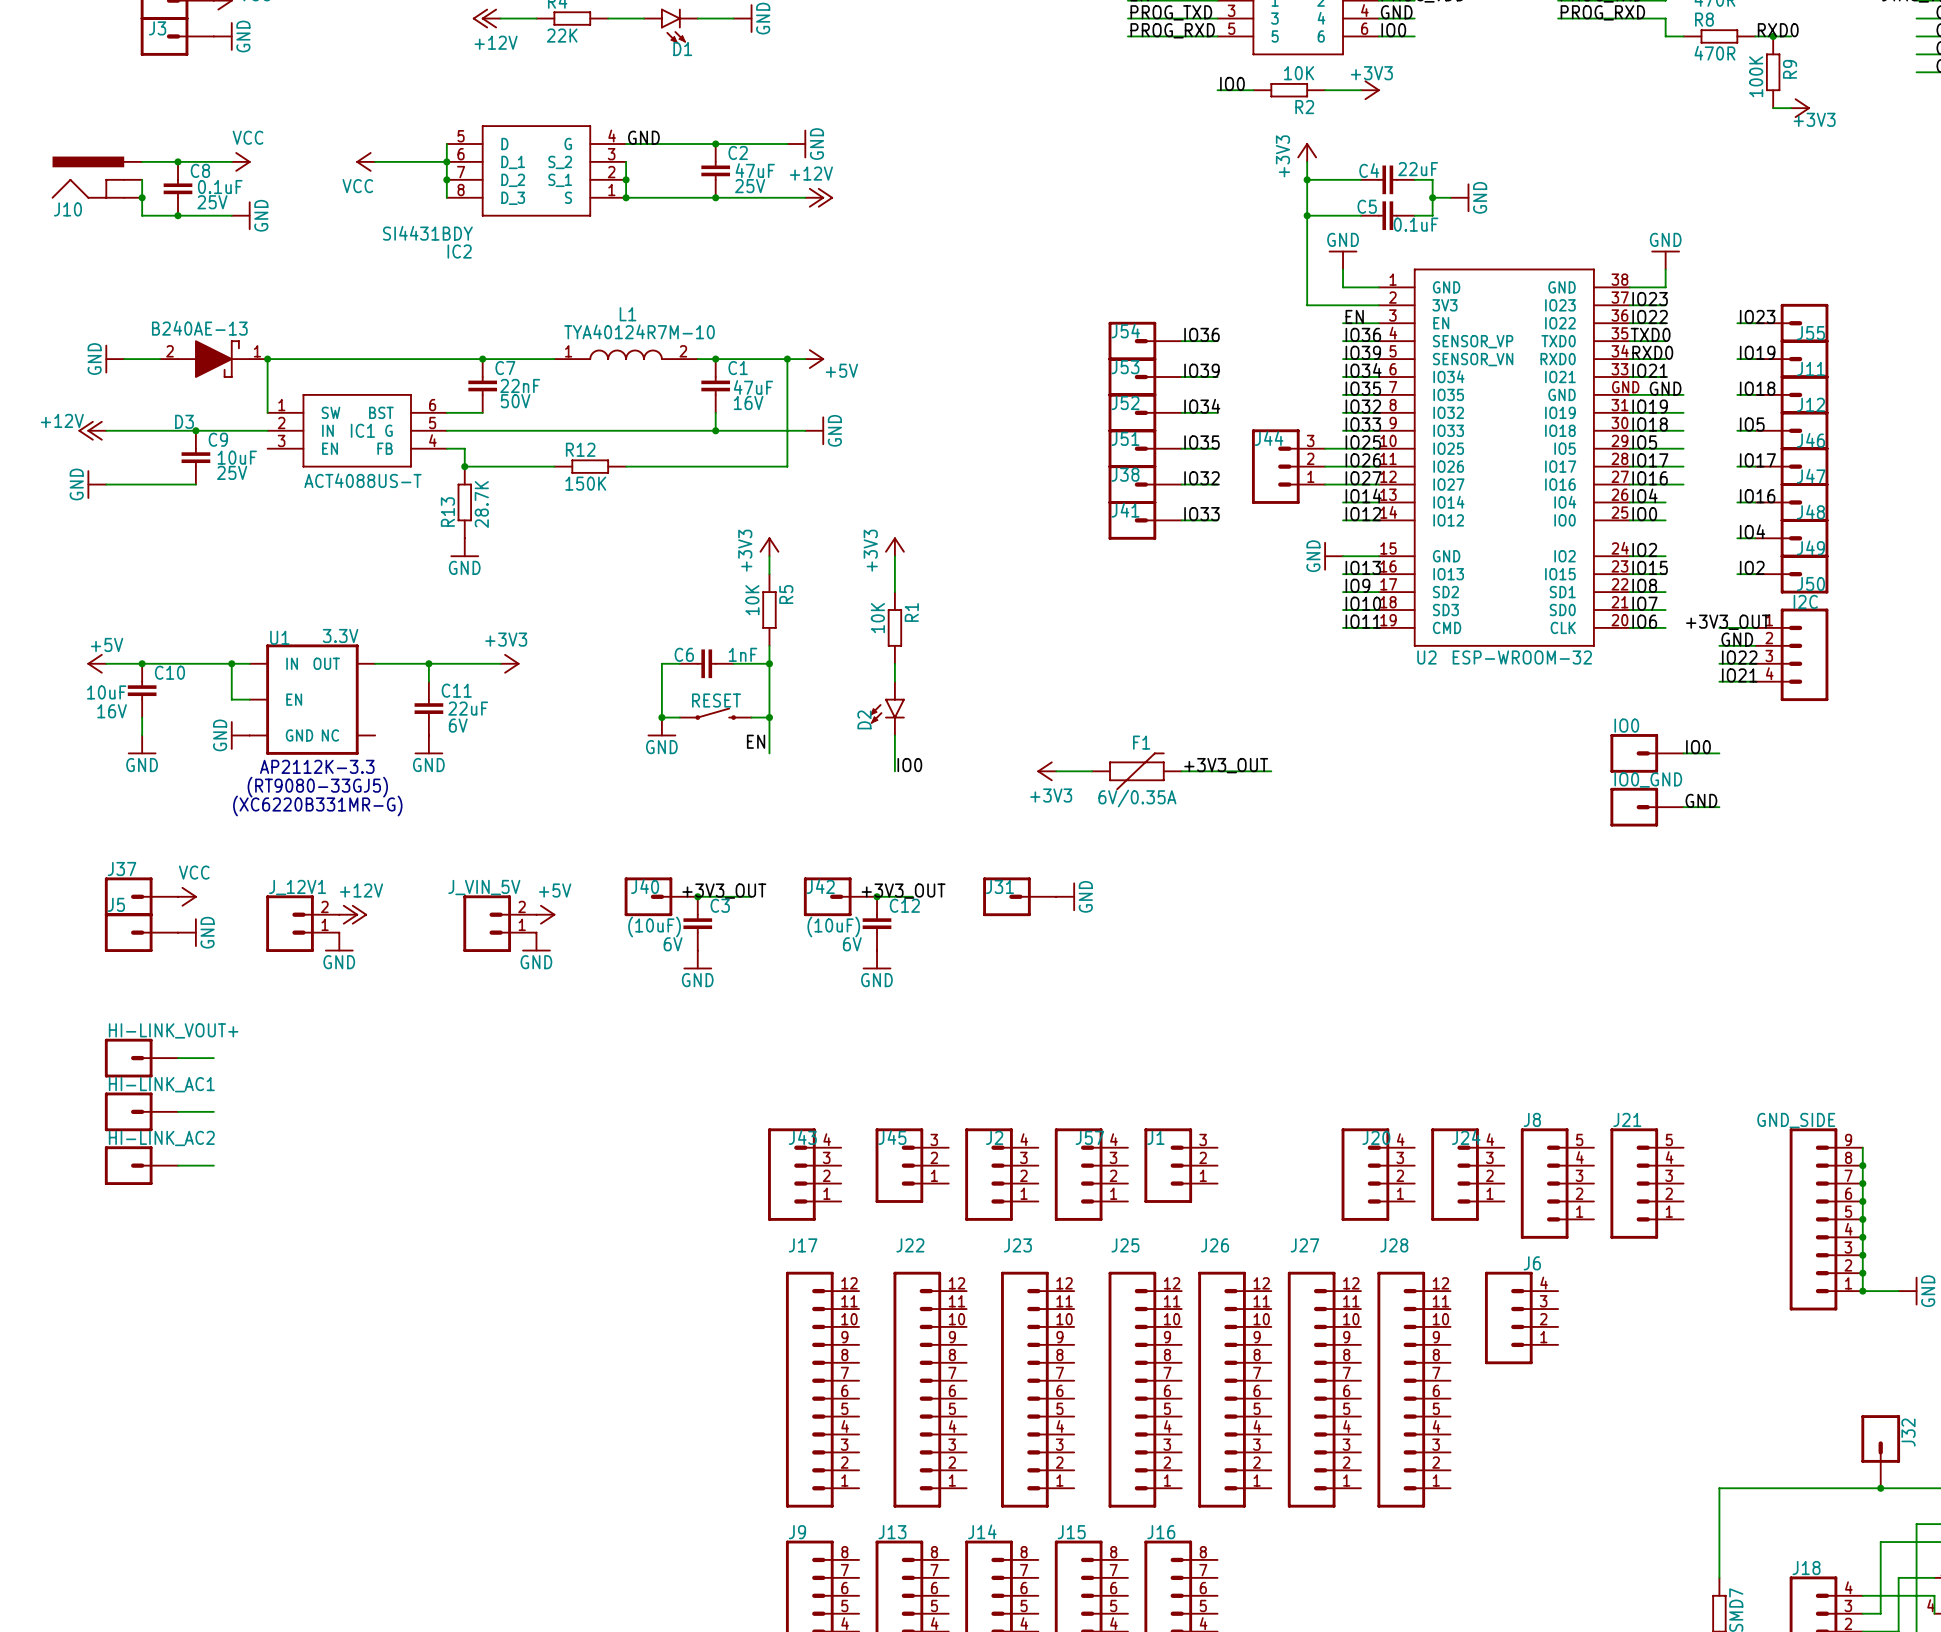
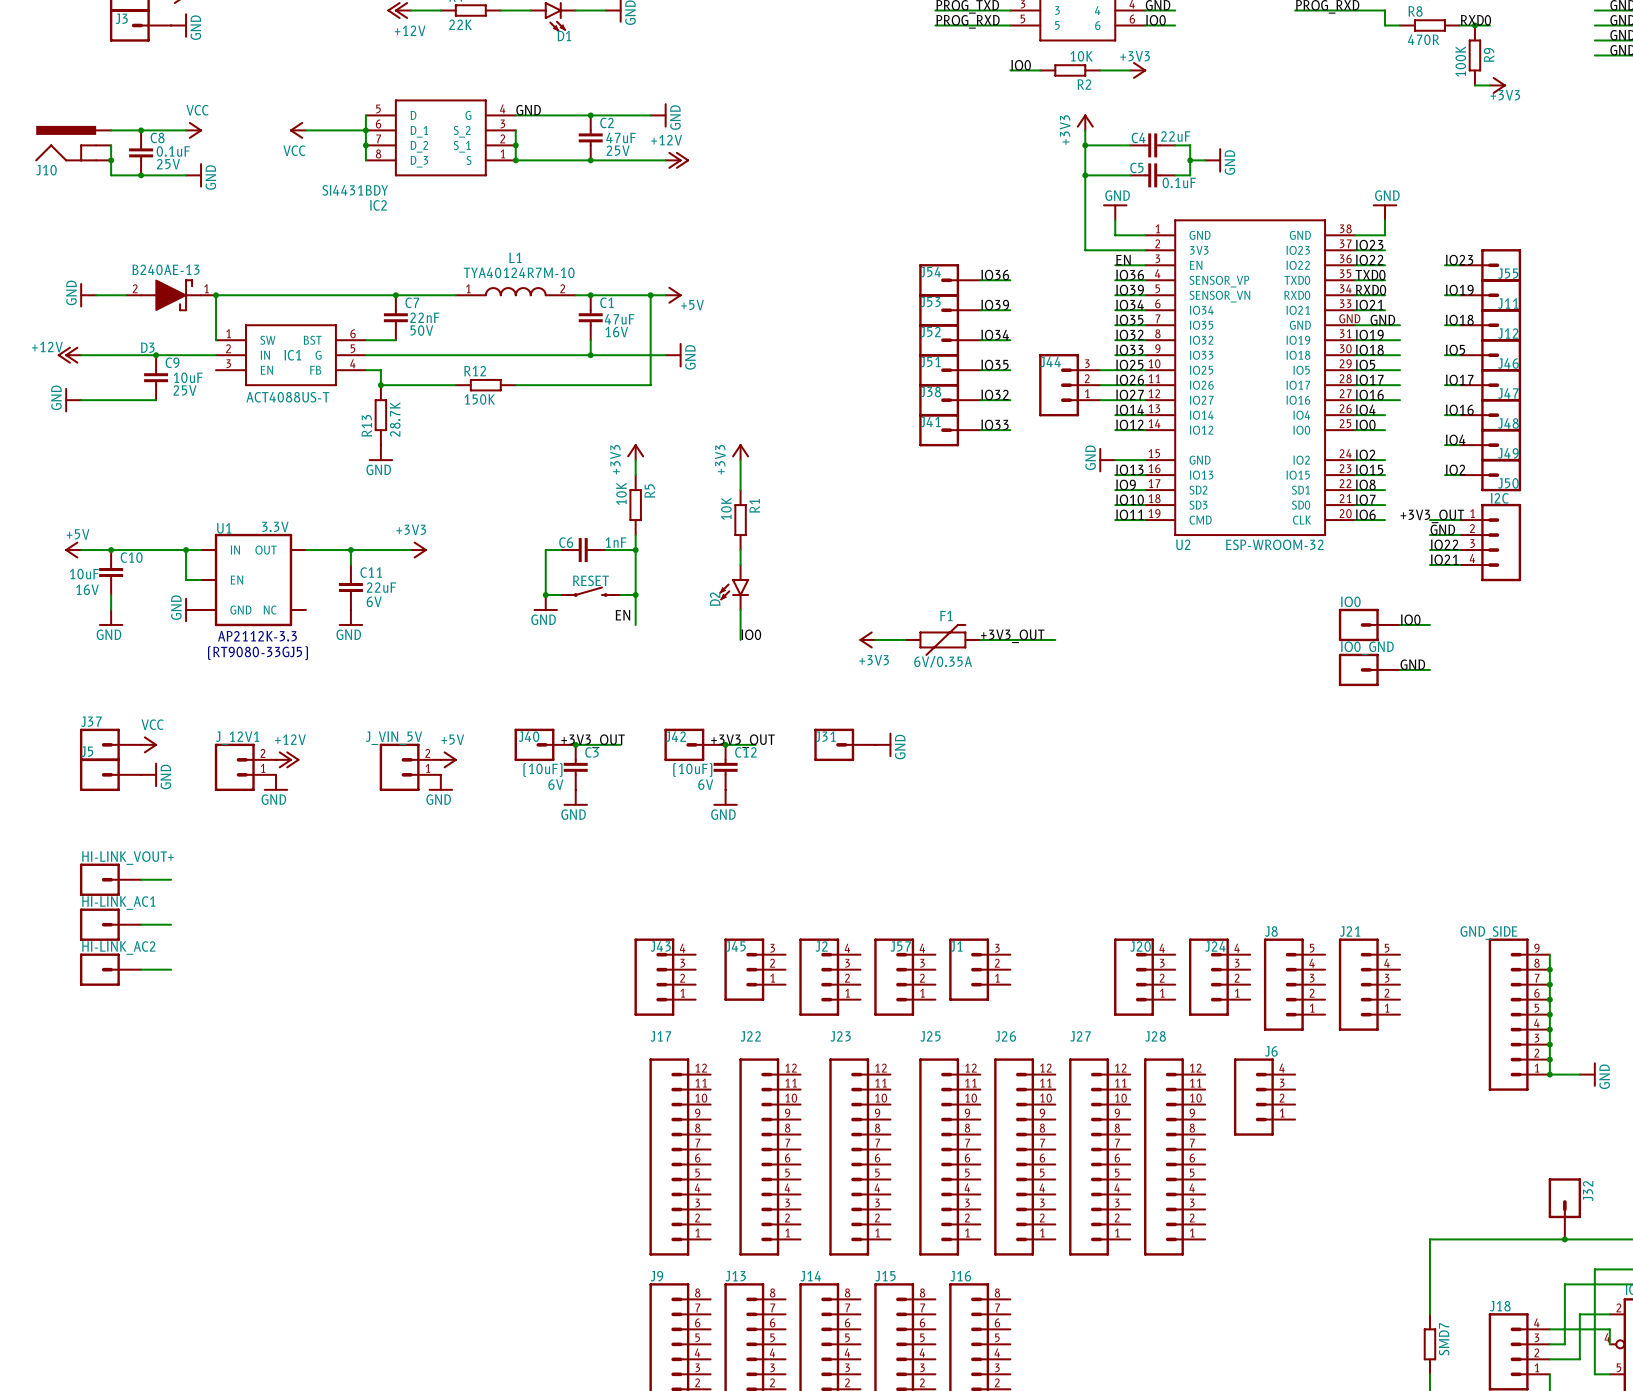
text: (XC6220B331MR-G) (317, 805) -> none

